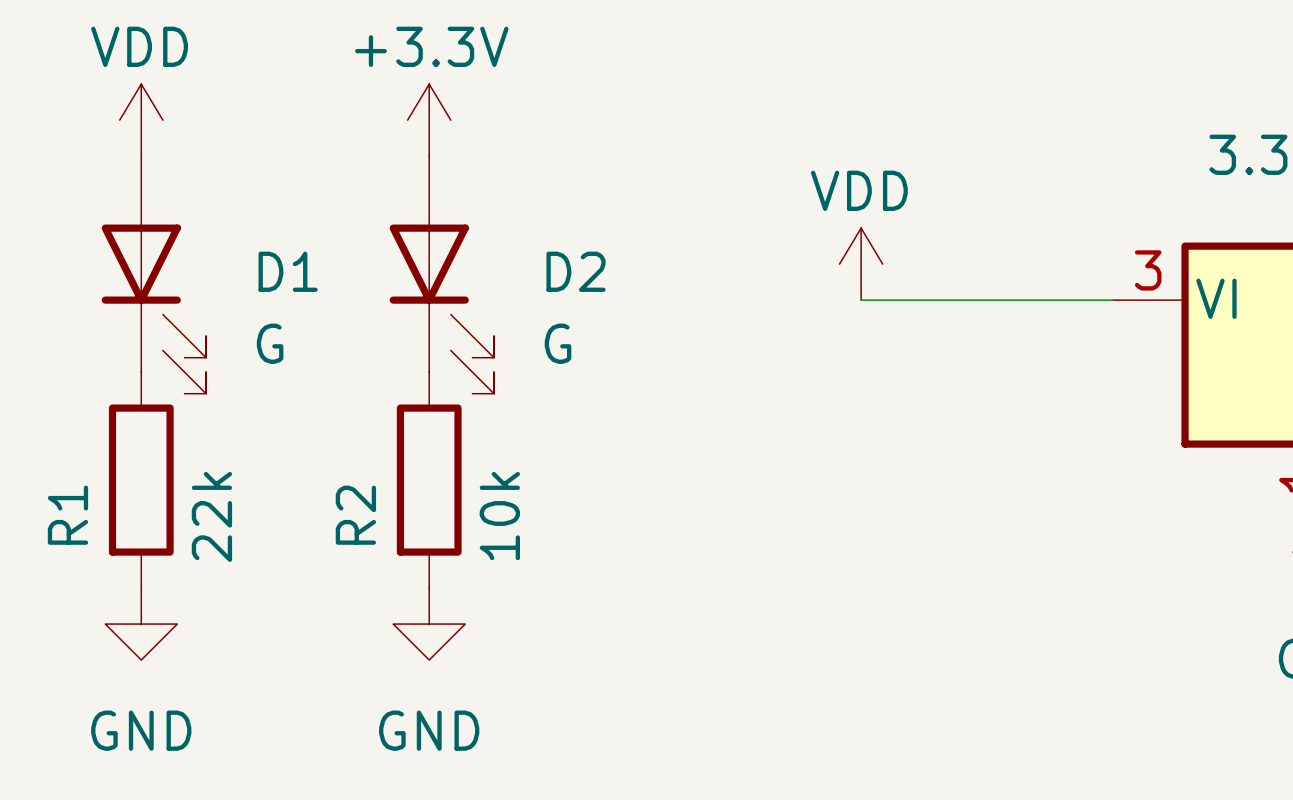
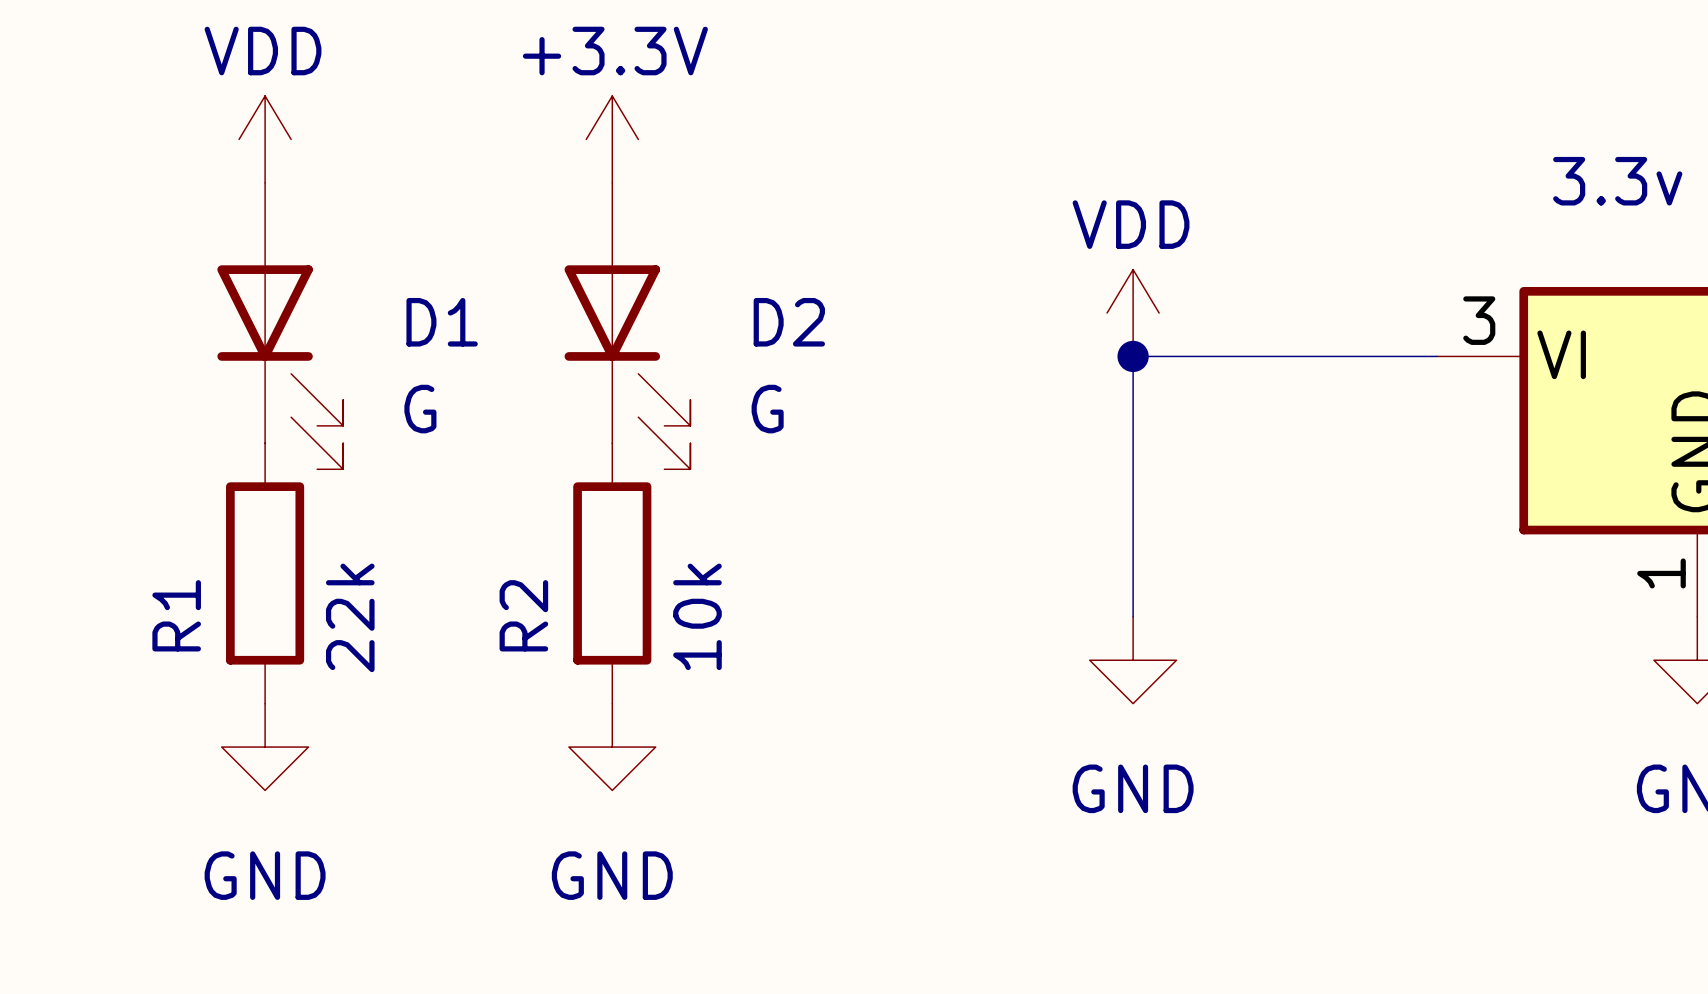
wire: none -> (1133, 356) (1133, 616)
junction: none -> (1133, 356)
power symbol: none -> GND (1133, 660)

